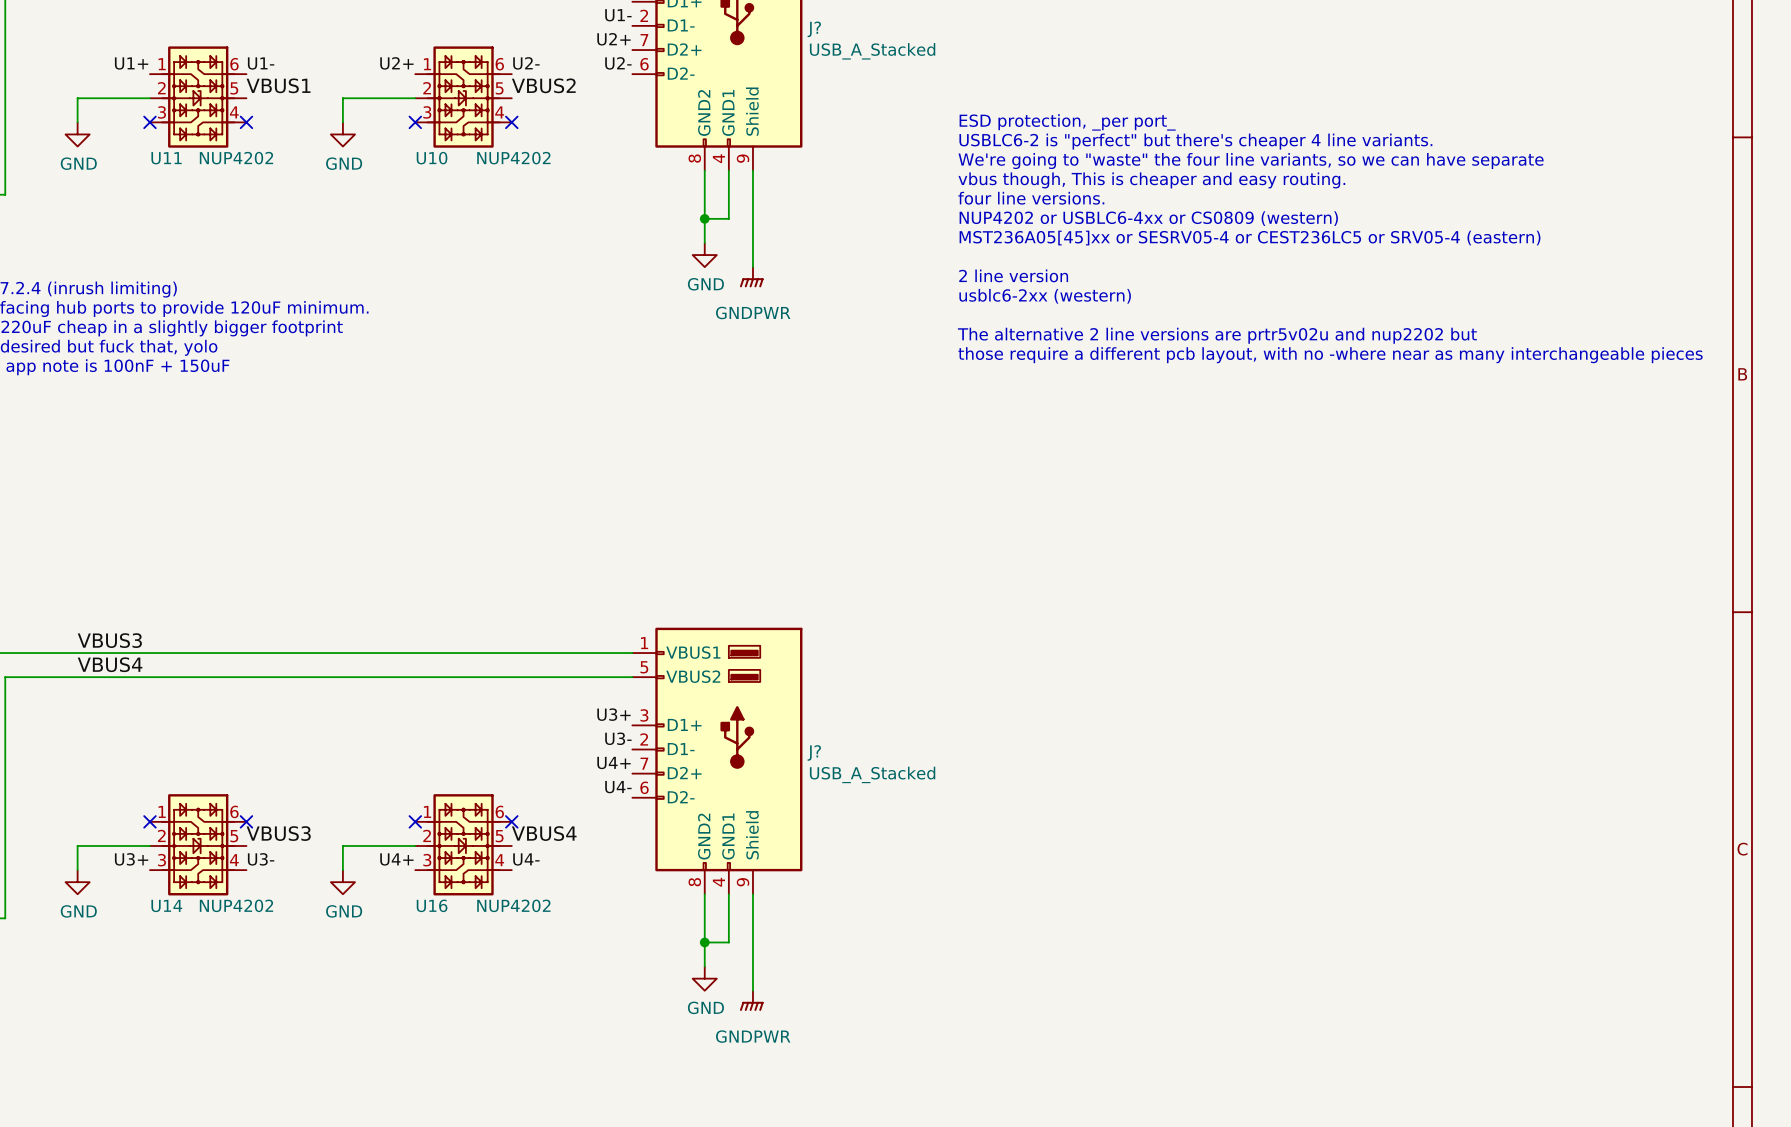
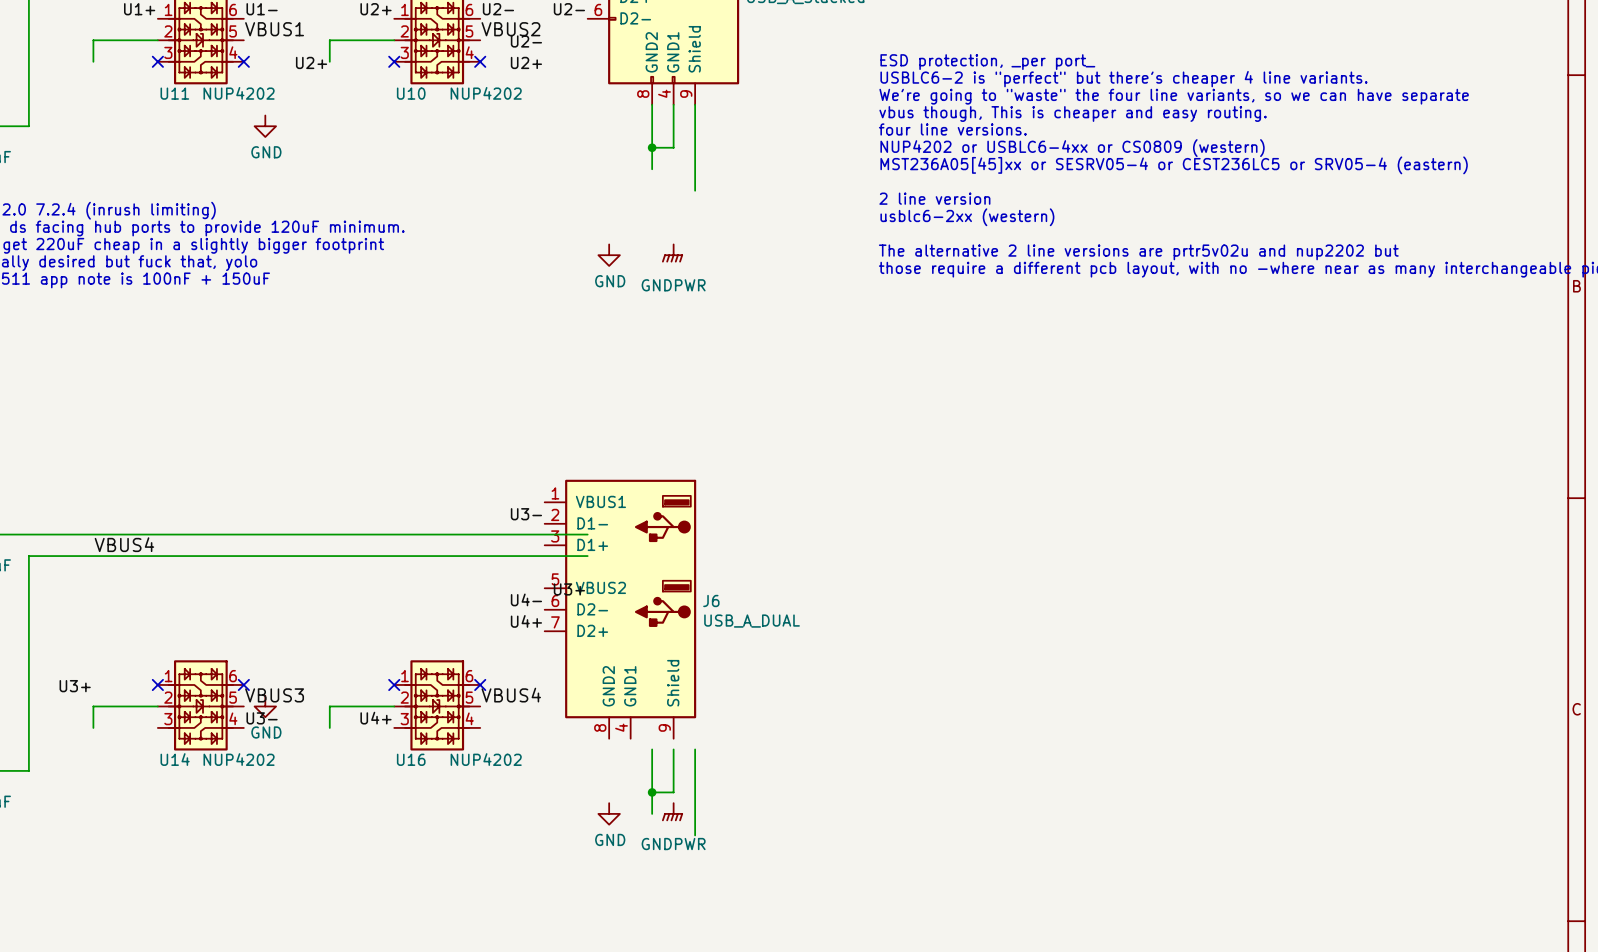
label: none -> U2- (526, 41)
label: none -> U2+ (311, 62)
label: none -> U2+ (526, 62)
power symbol: GND (77, 134) -> none
power symbol position: GND (342, 134) -> GND (265, 126)
power symbol position: GND (704, 255) -> GND (609, 255)
power symbol position: GNDPWR (751, 277) -> GNDPWR (672, 253)
label: VBUS3 (109, 640) -> none
label: none -> U4- (526, 599)
J6: none -> USB_A_DUAL (620, 609)
label position: U3- (618, 738) -> U3- (526, 514)
J?: USB_A_Stacked (717, 760) -> none
label position: U4+ (613, 762) -> U4+ (526, 621)
label: U4- (618, 787) -> none
label position: U3+ (131, 859) -> U3+ (75, 686)
label: U4- (526, 859) -> none
power symbol: GND (77, 882) -> none
power symbol position: GND (342, 882) -> GND (265, 706)
power symbol position: GND (704, 978) -> GND (609, 813)
power symbol position: GNDPWR (751, 1000) -> GNDPWR (672, 812)

